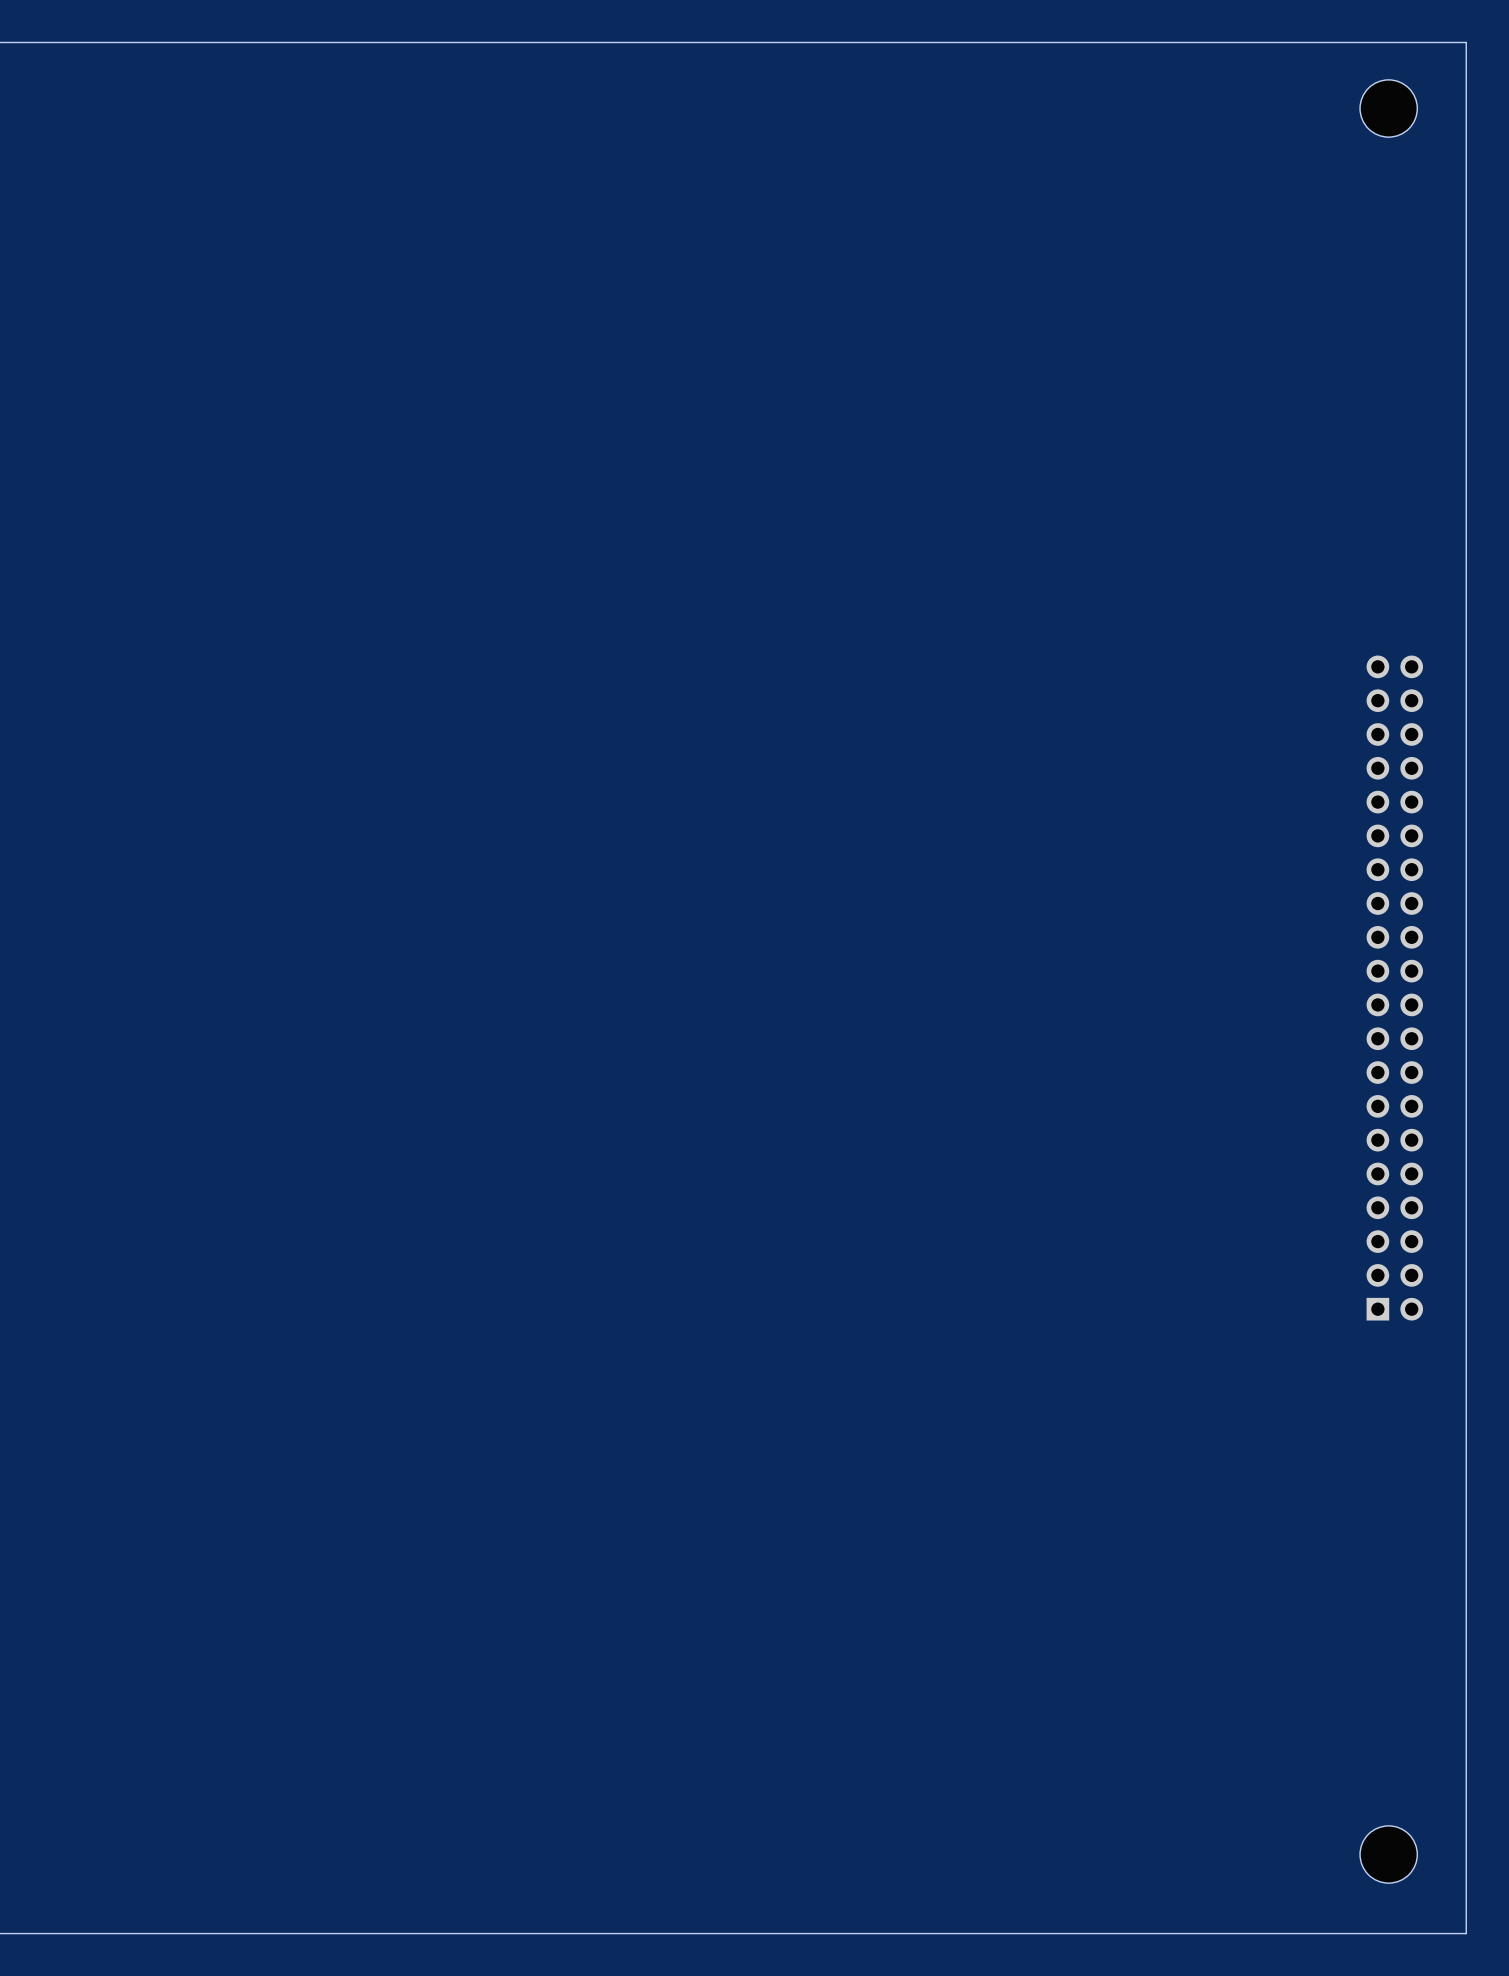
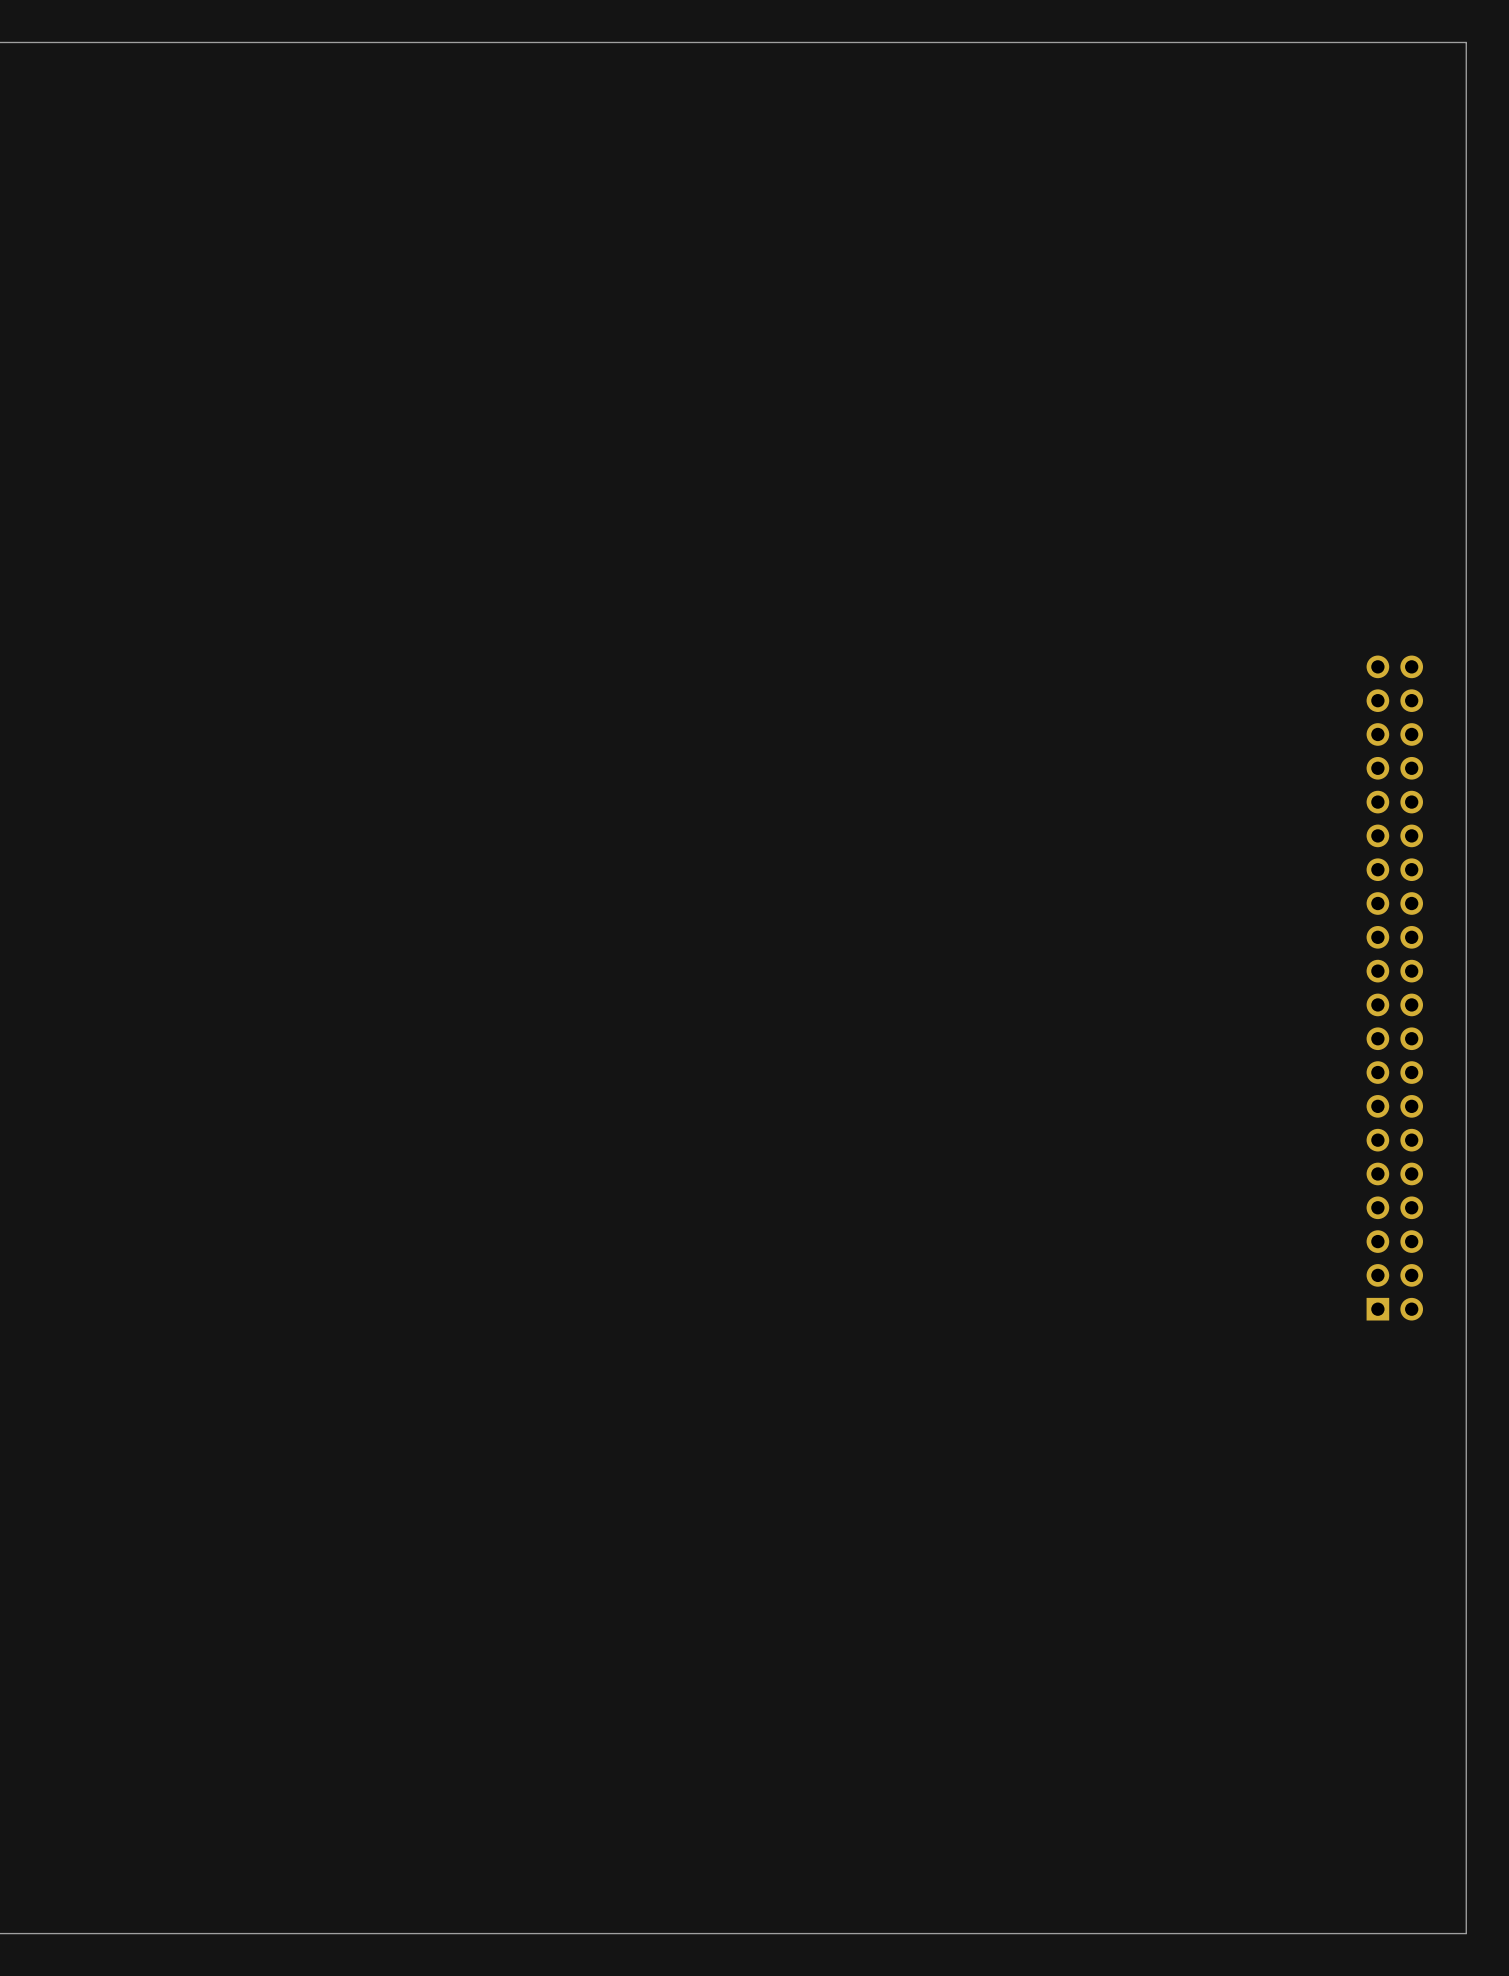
part: (1388, 108) -> none
part: (1388, 1854) -> none

